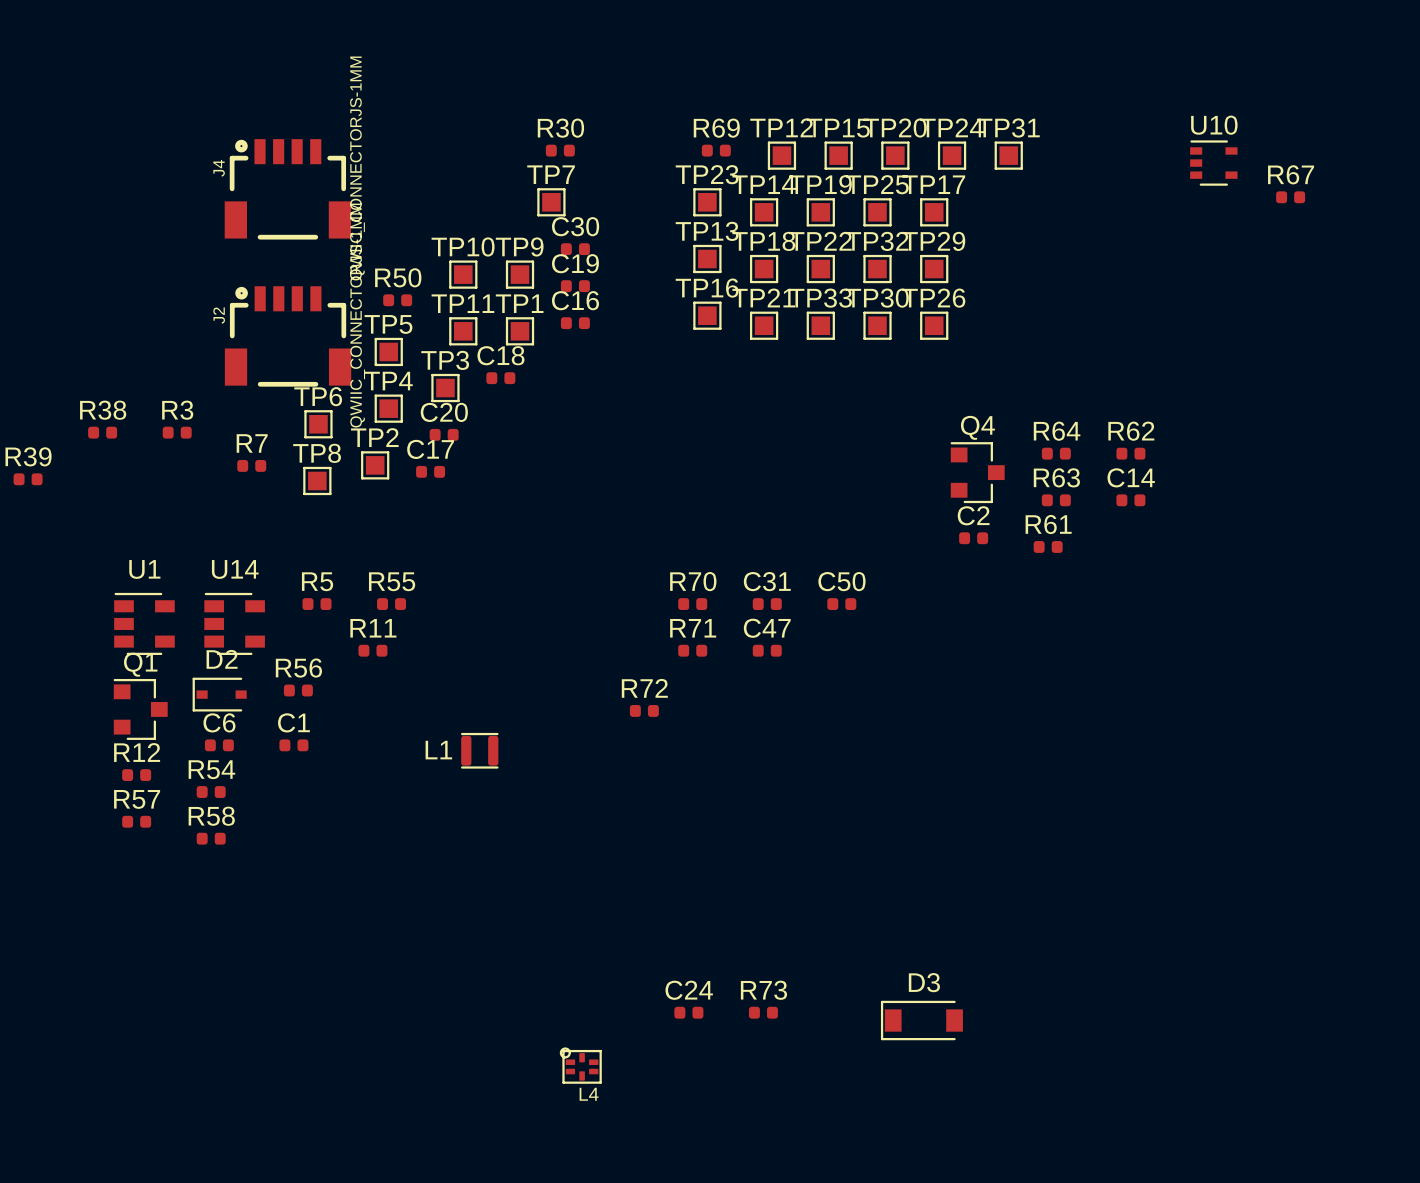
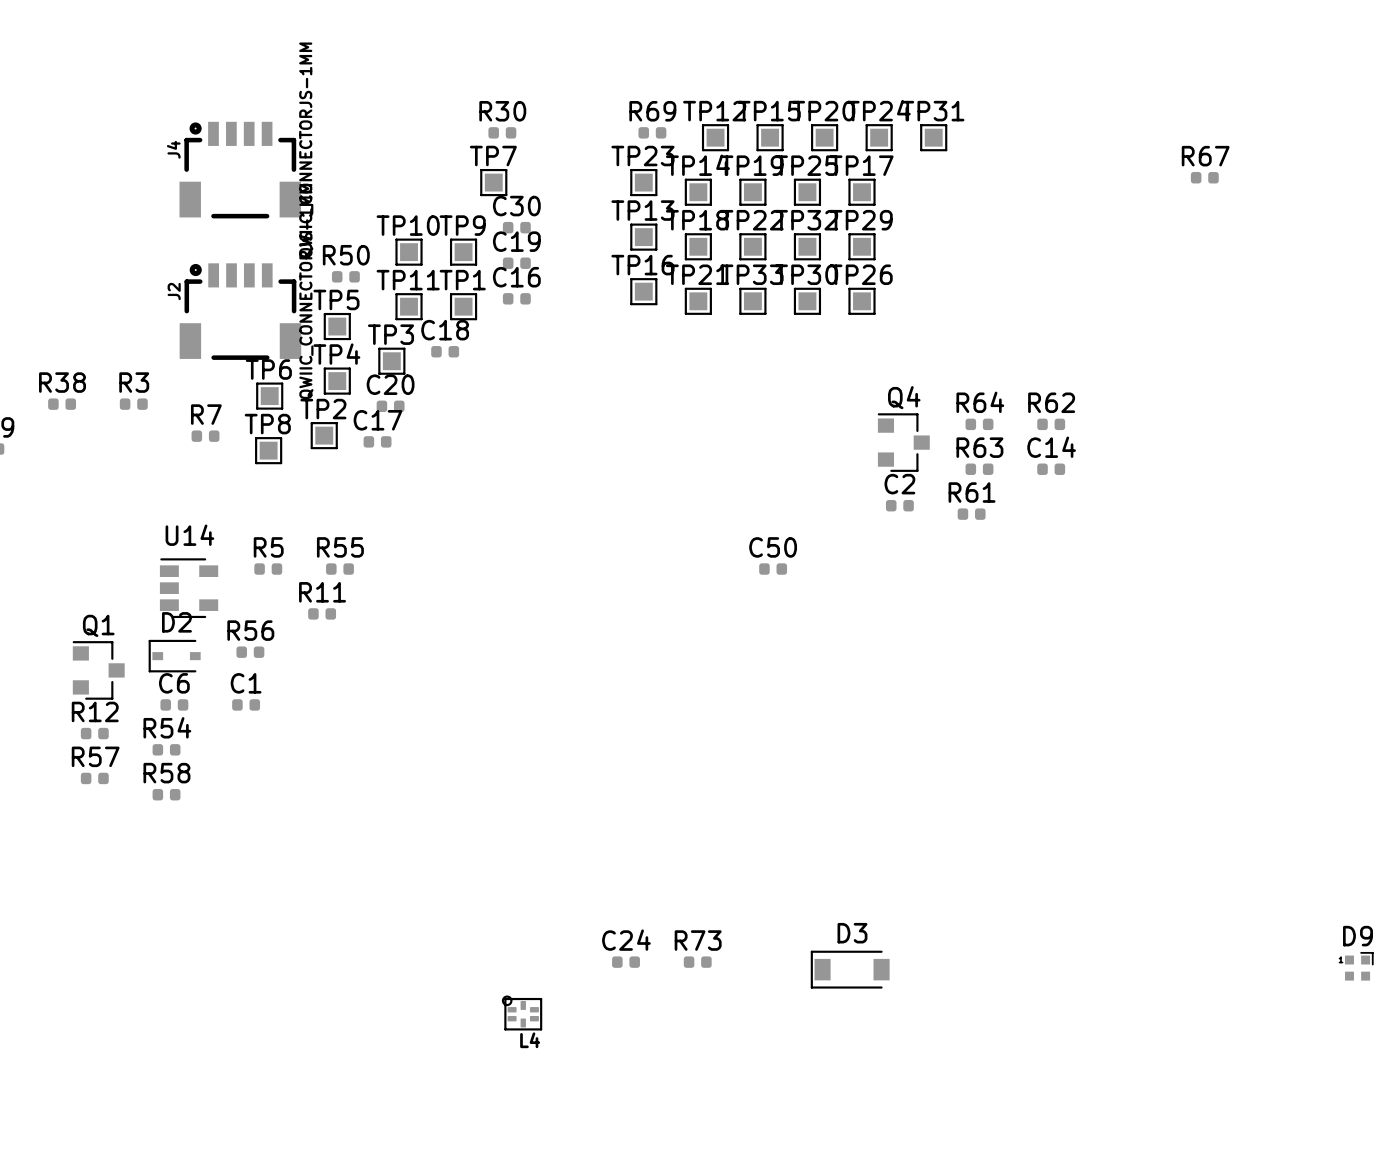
U10: (1213, 163) -> none
R70: (692, 604) -> none
C31: (767, 604) -> none
U1: (144, 623) -> none
R71: (692, 650) -> none
C47: (767, 650) -> none
R72: (644, 710) -> none
L1: (479, 750) -> none

